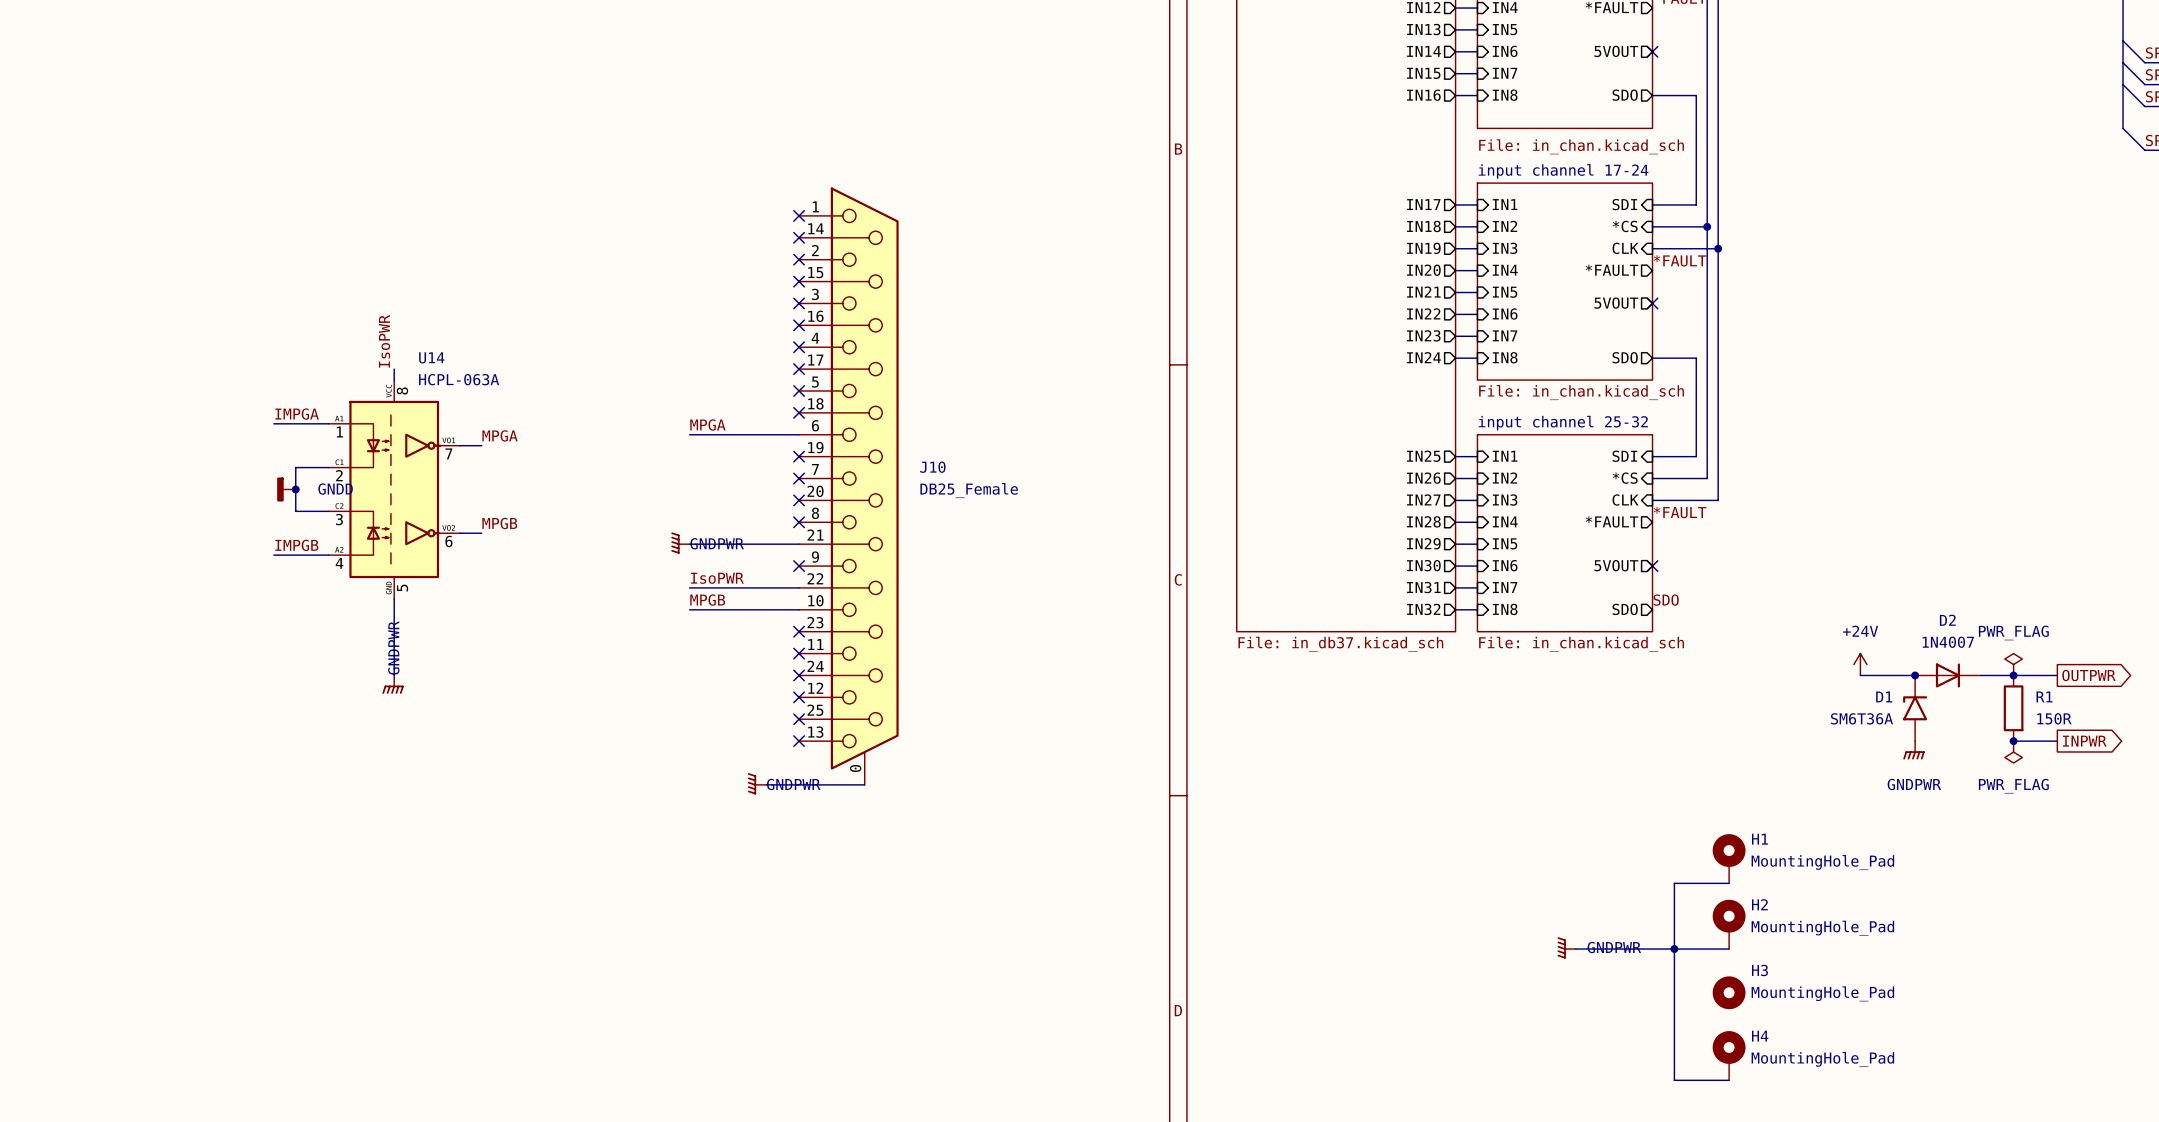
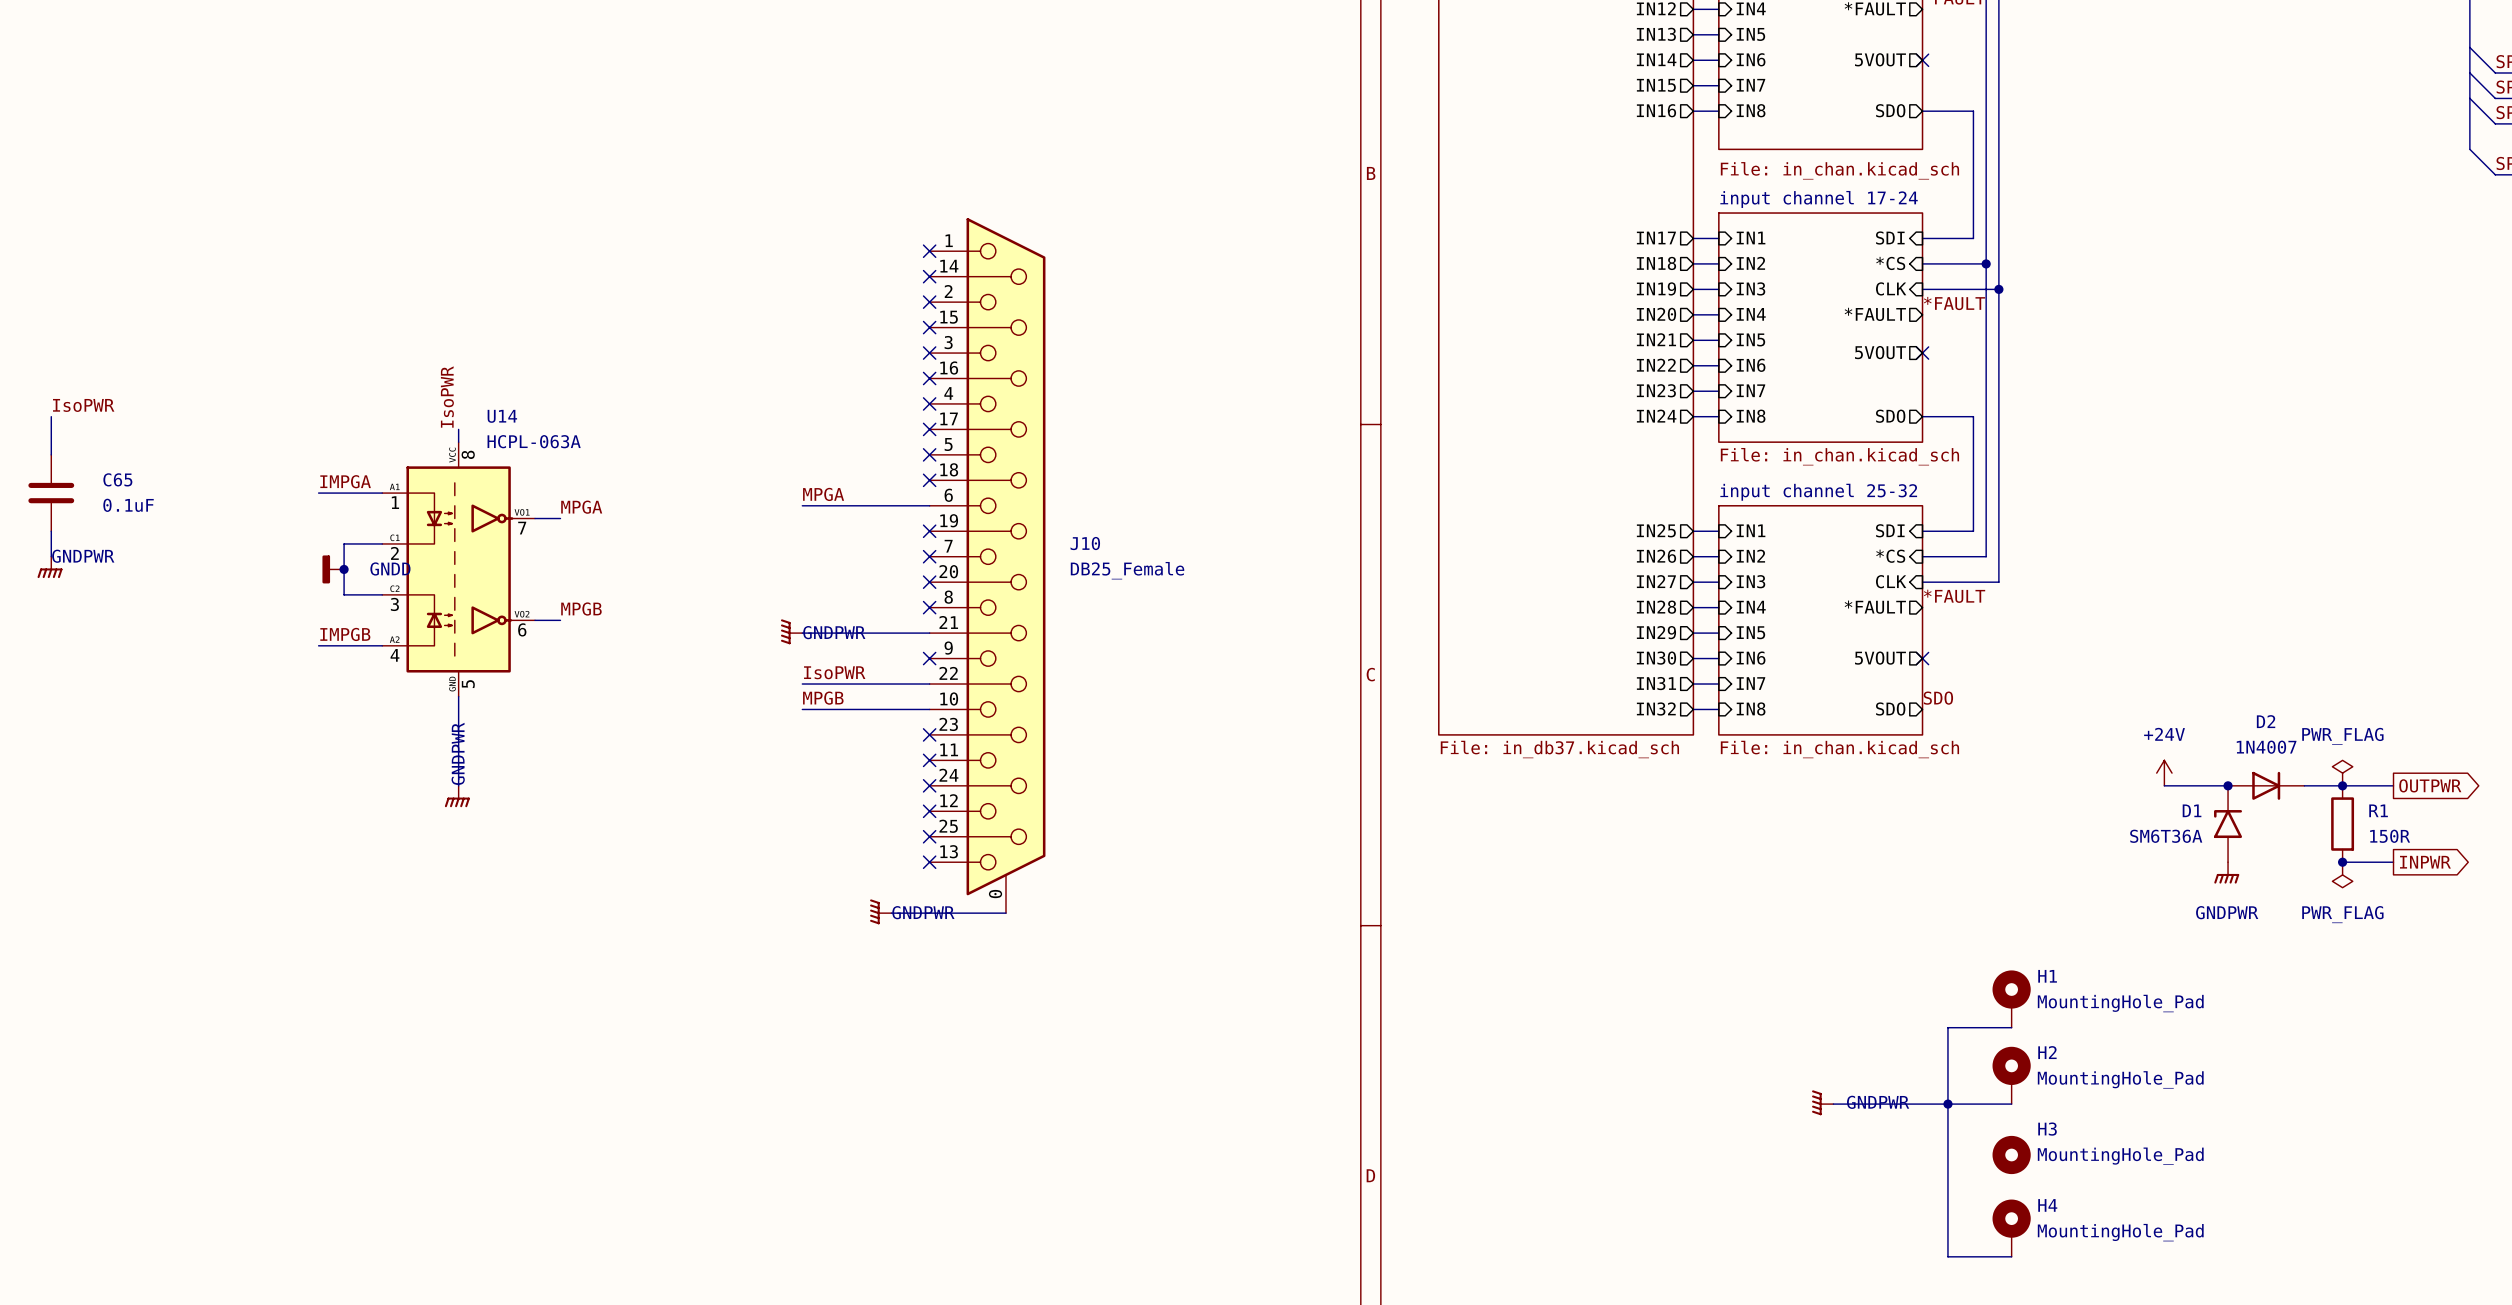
label: none -> IsoPWR (83, 405)
wire: none -> (51, 416) (51, 454)
C65: none -> 0.1uF (51, 493)
wire: none -> (51, 531) (51, 556)
power symbol: none -> GNDPWR (50, 567)

